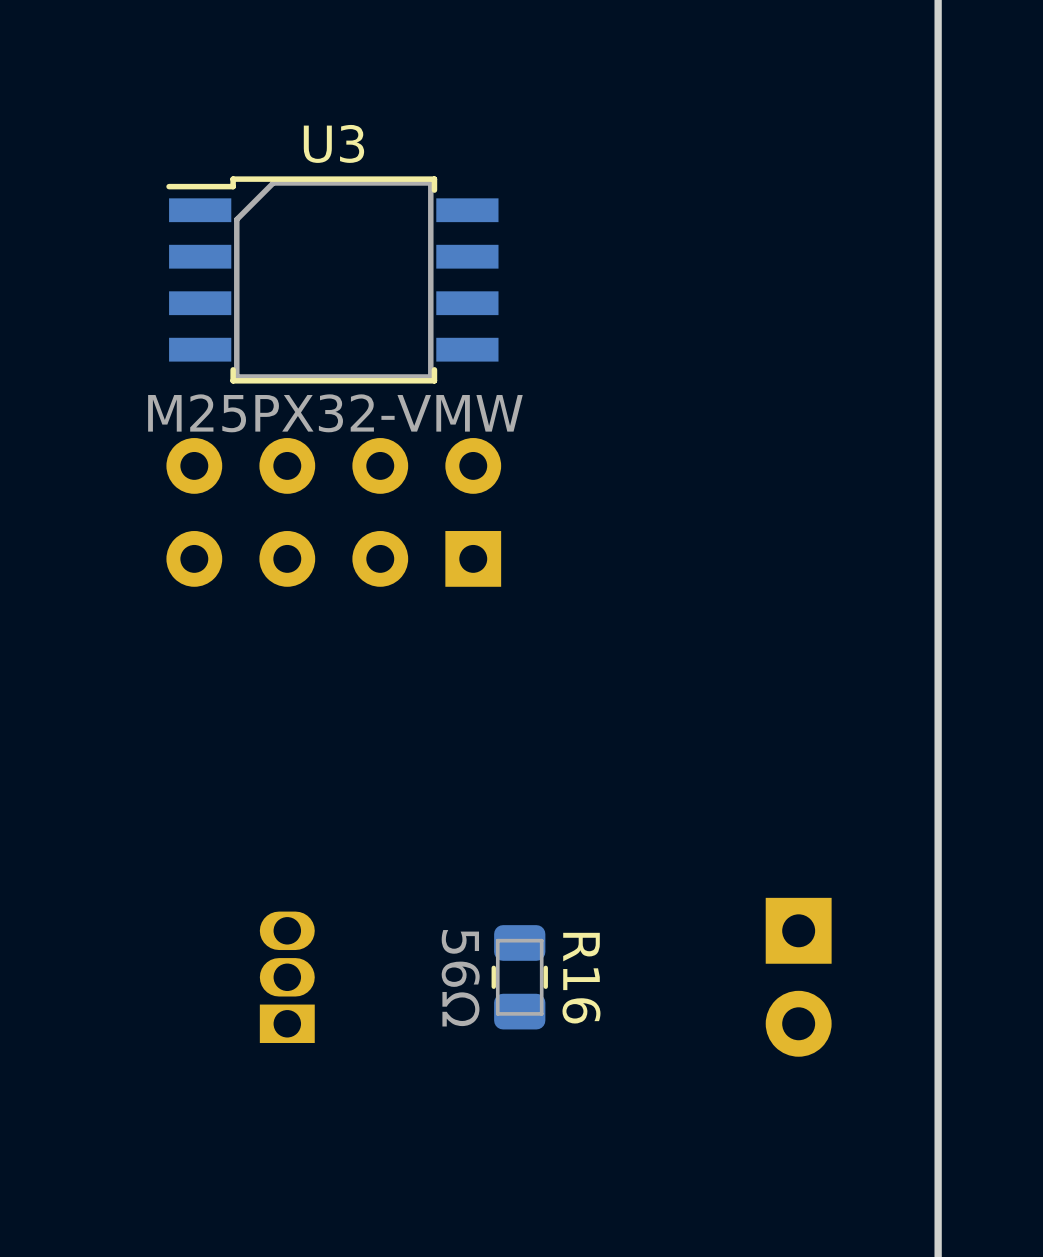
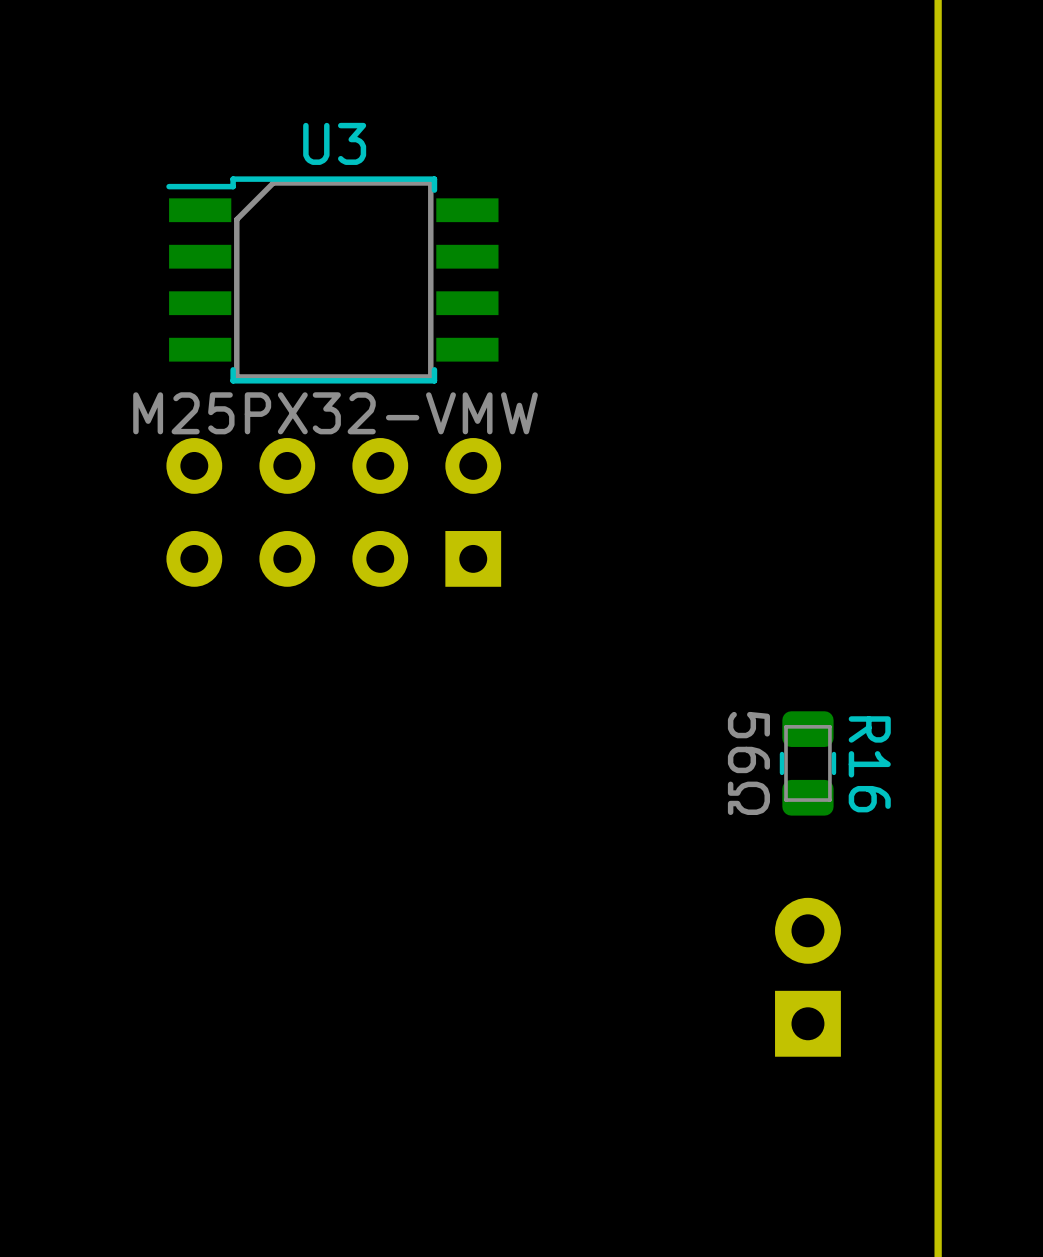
part: (287, 977) -> none
R16 position: (519, 977) -> (807, 763)
part rotation: 0° (798, 977) -> 180° (807, 977)

